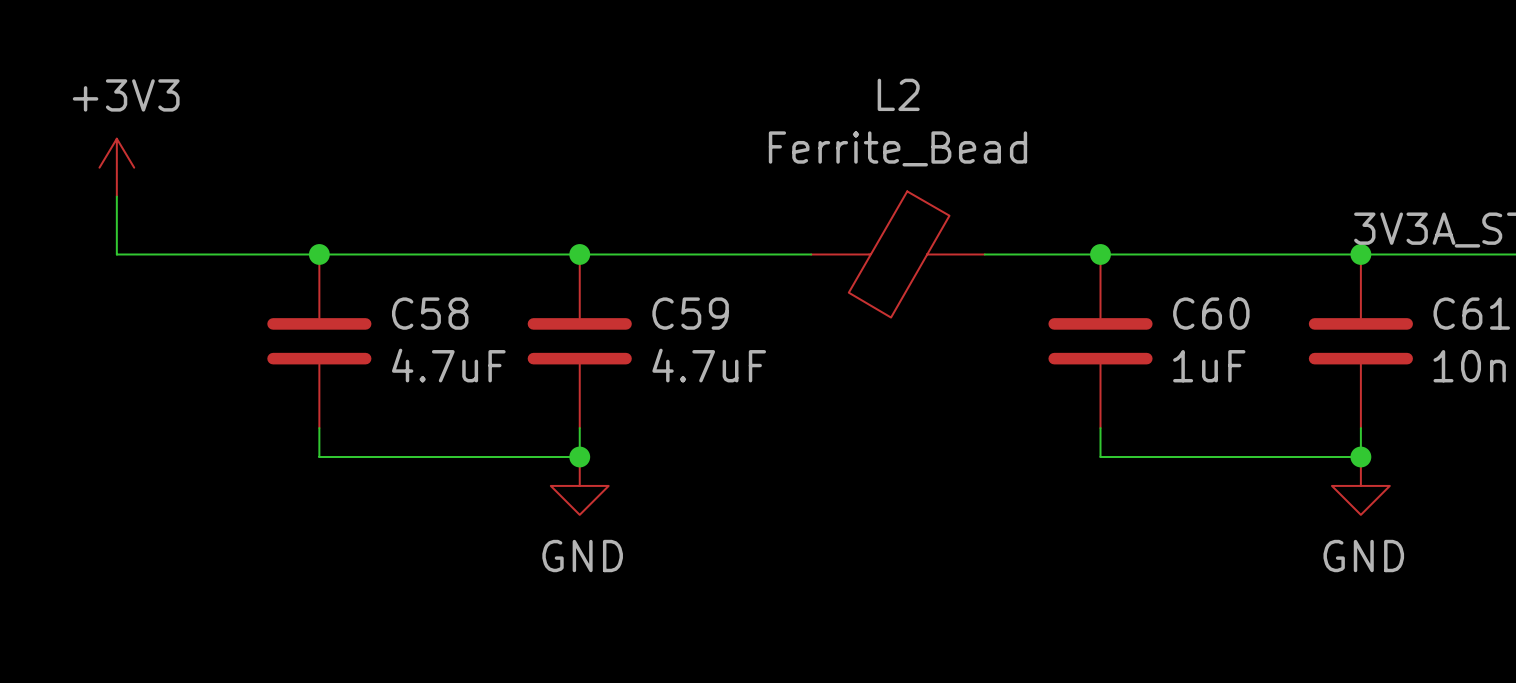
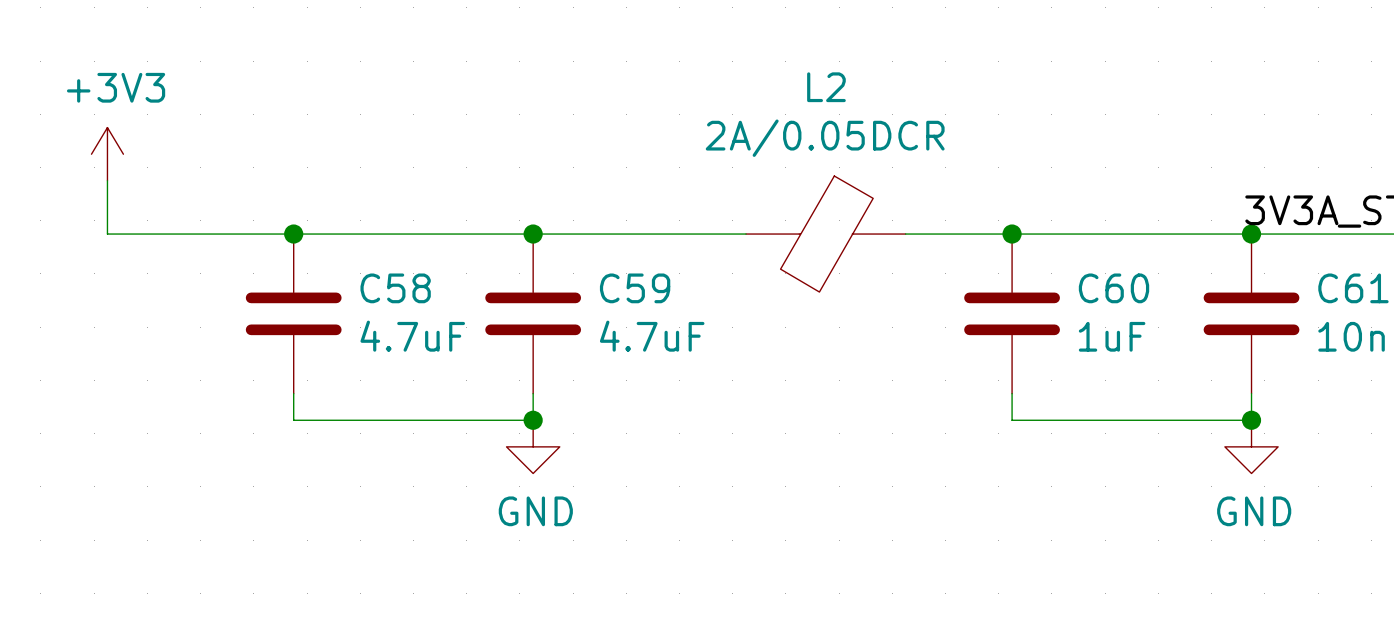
L2 value: Ferrite_Bead (897, 148) -> 2A/0.05DCR (825, 138)

